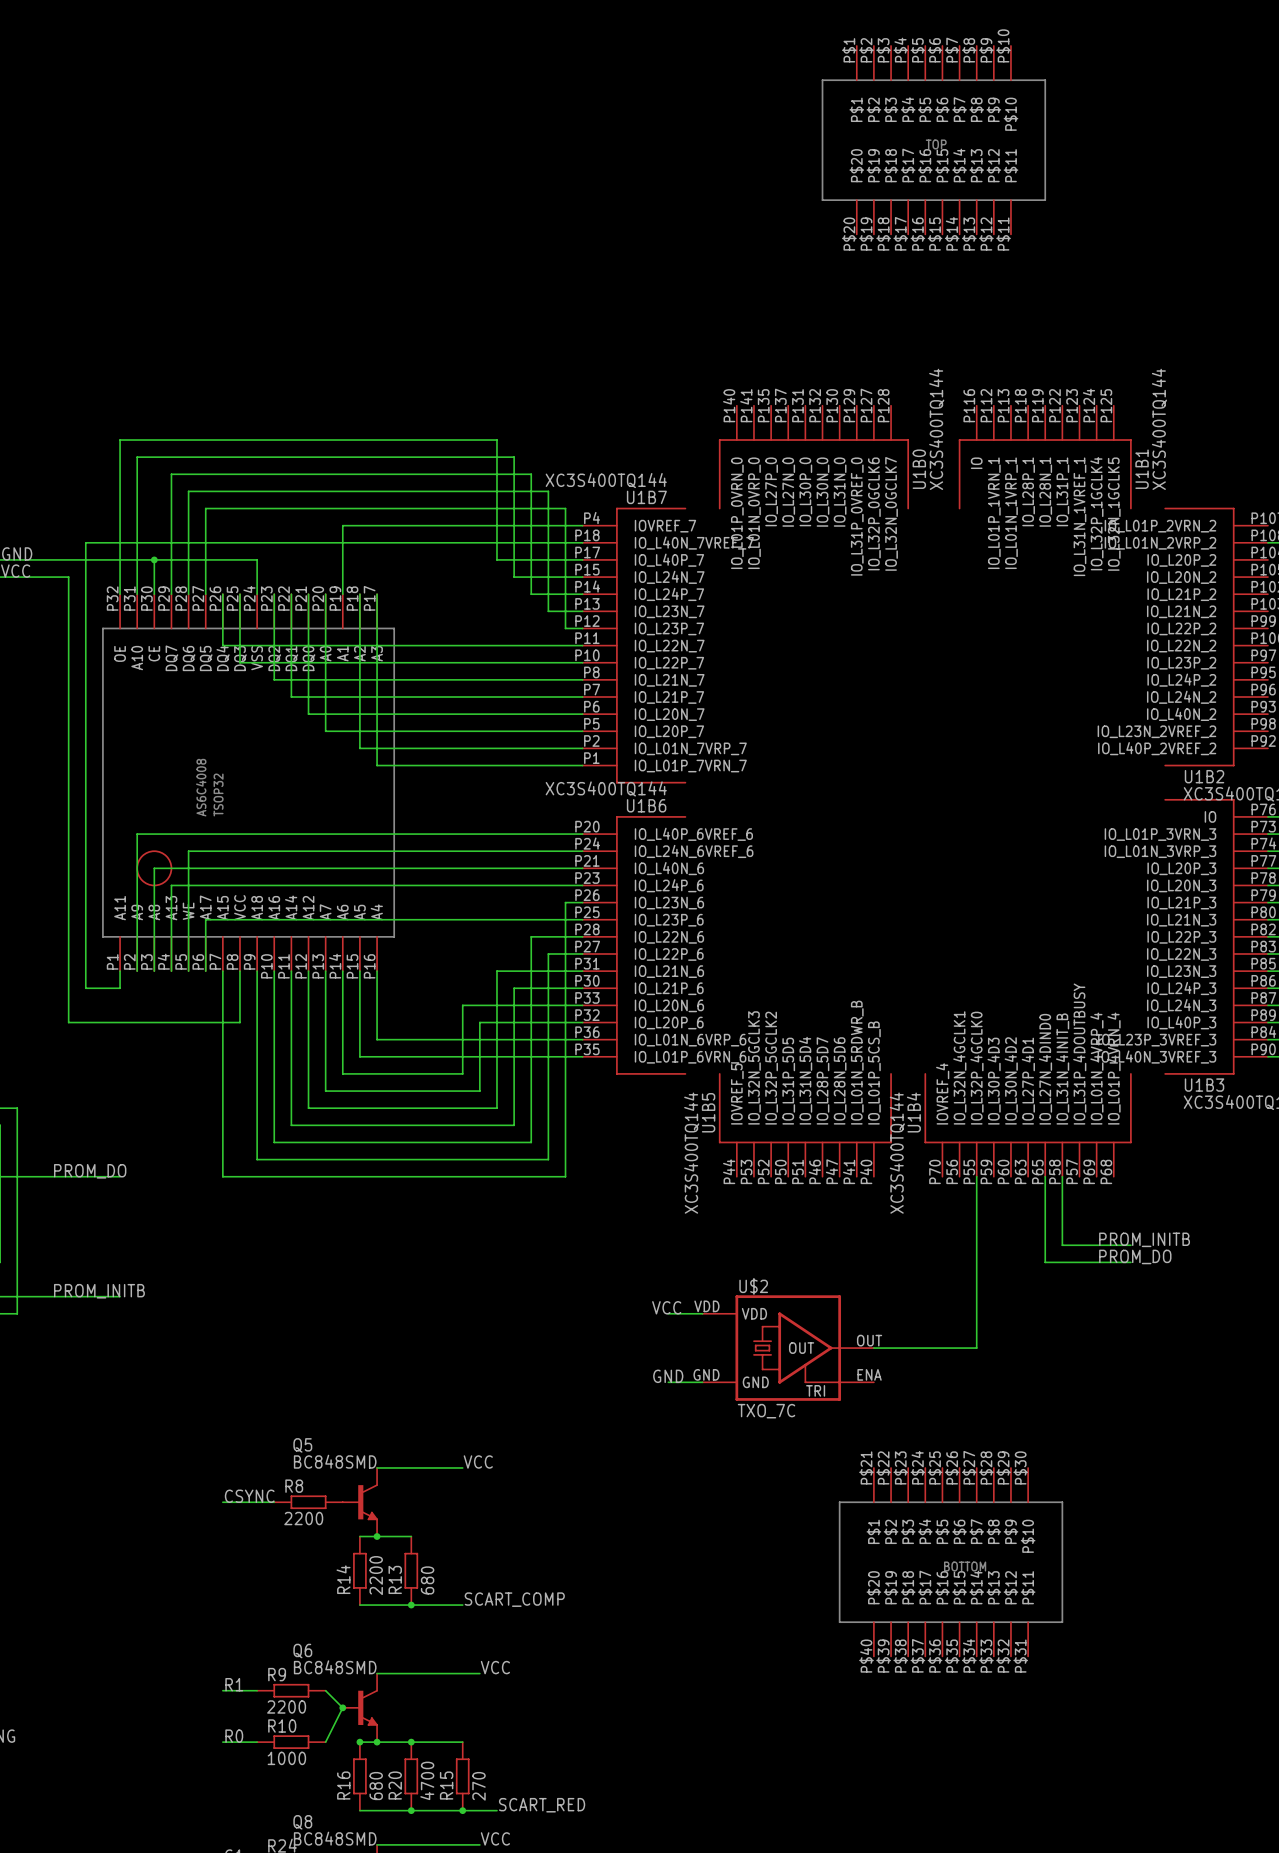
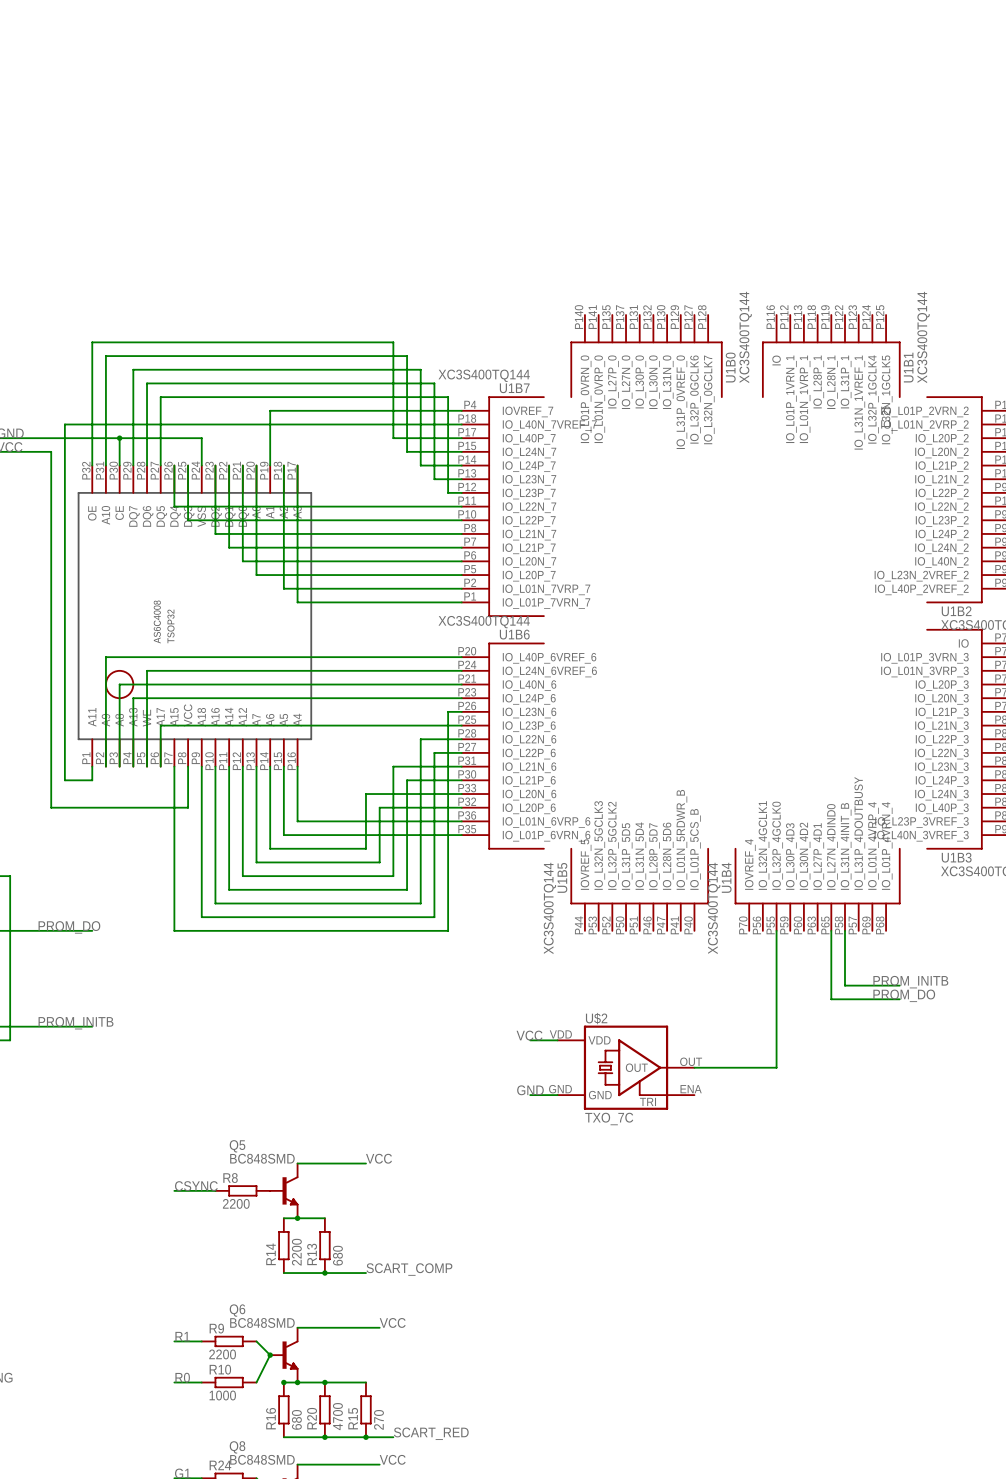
part: (933, 140) -> none
part: (951, 1562) -> none

